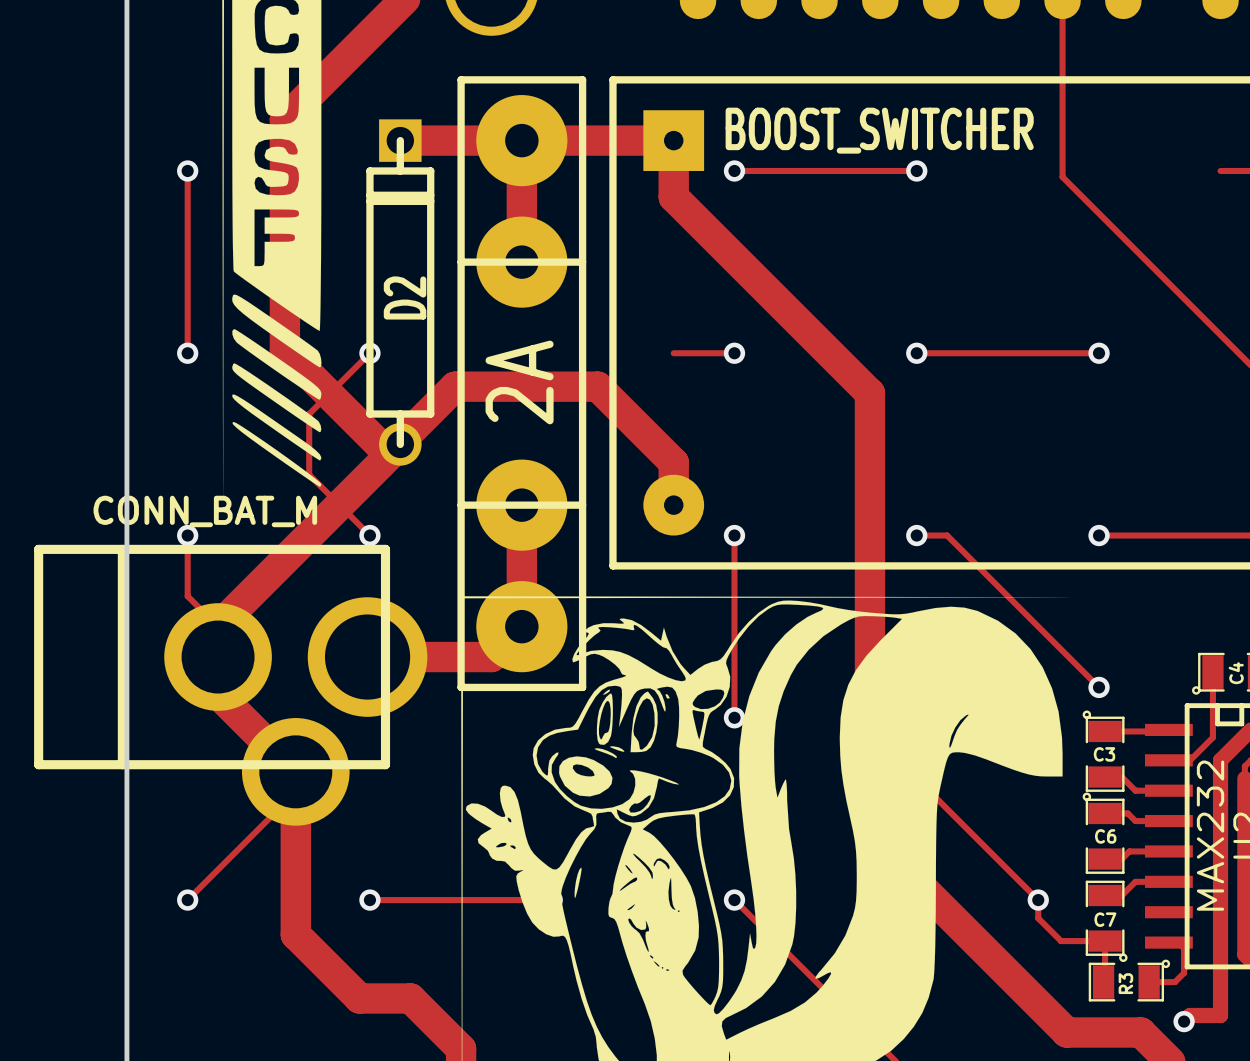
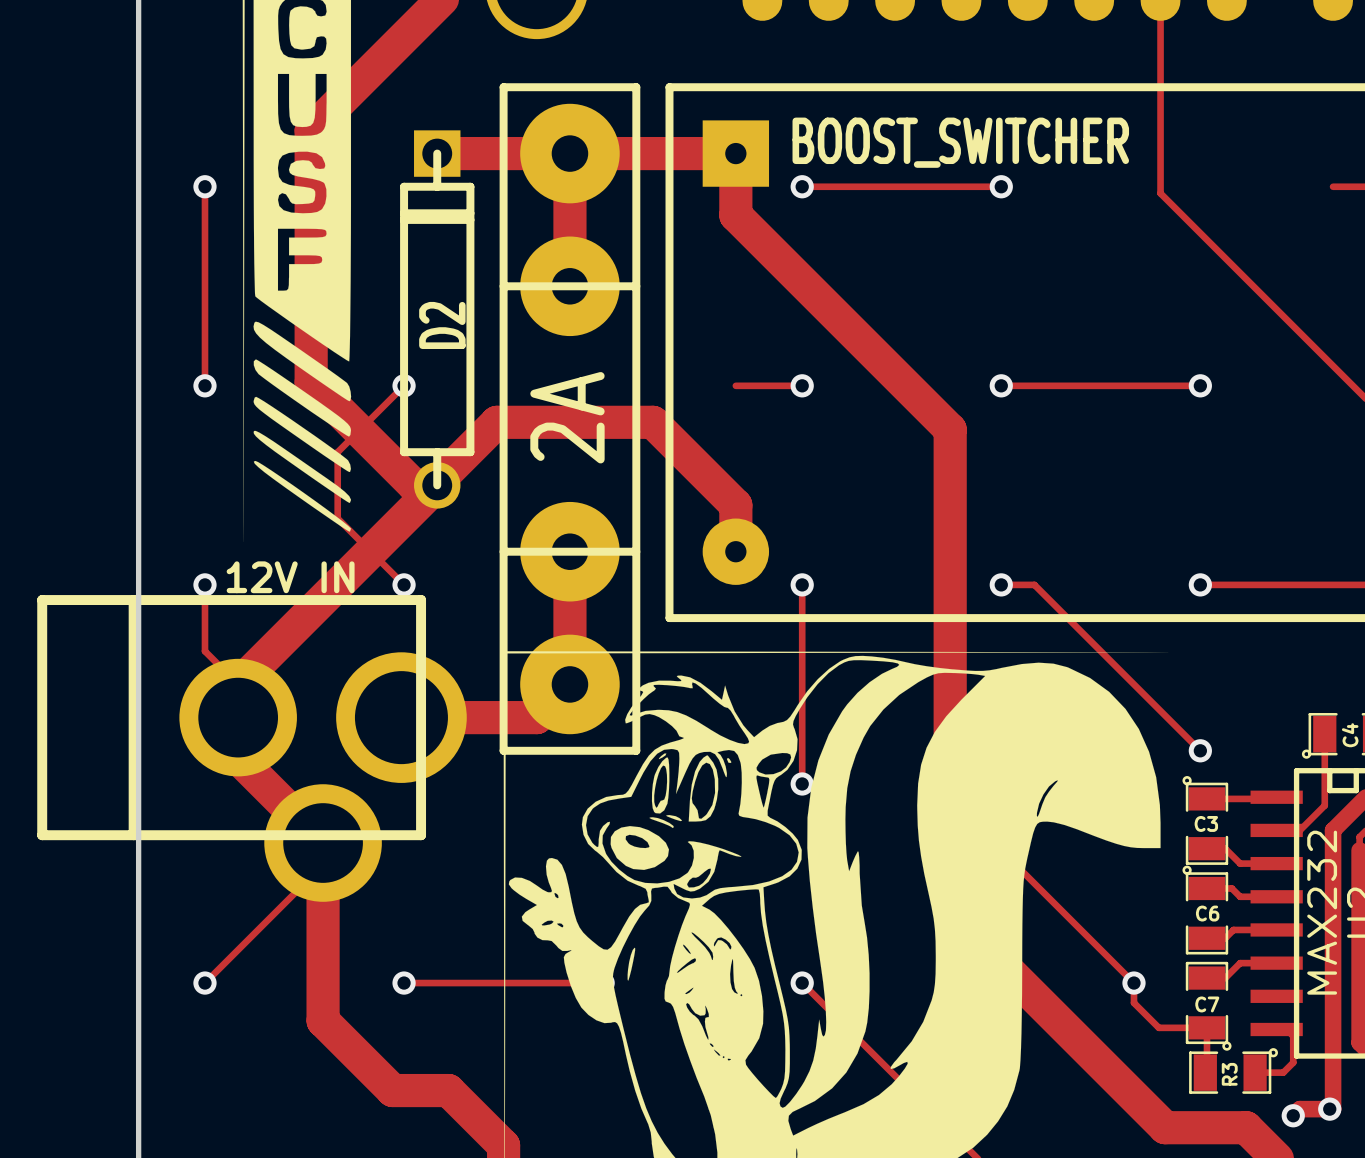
part value: CONN_BAT_M (205, 511) -> 12V IN (290, 577)
via: none -> (1329, 1109)

